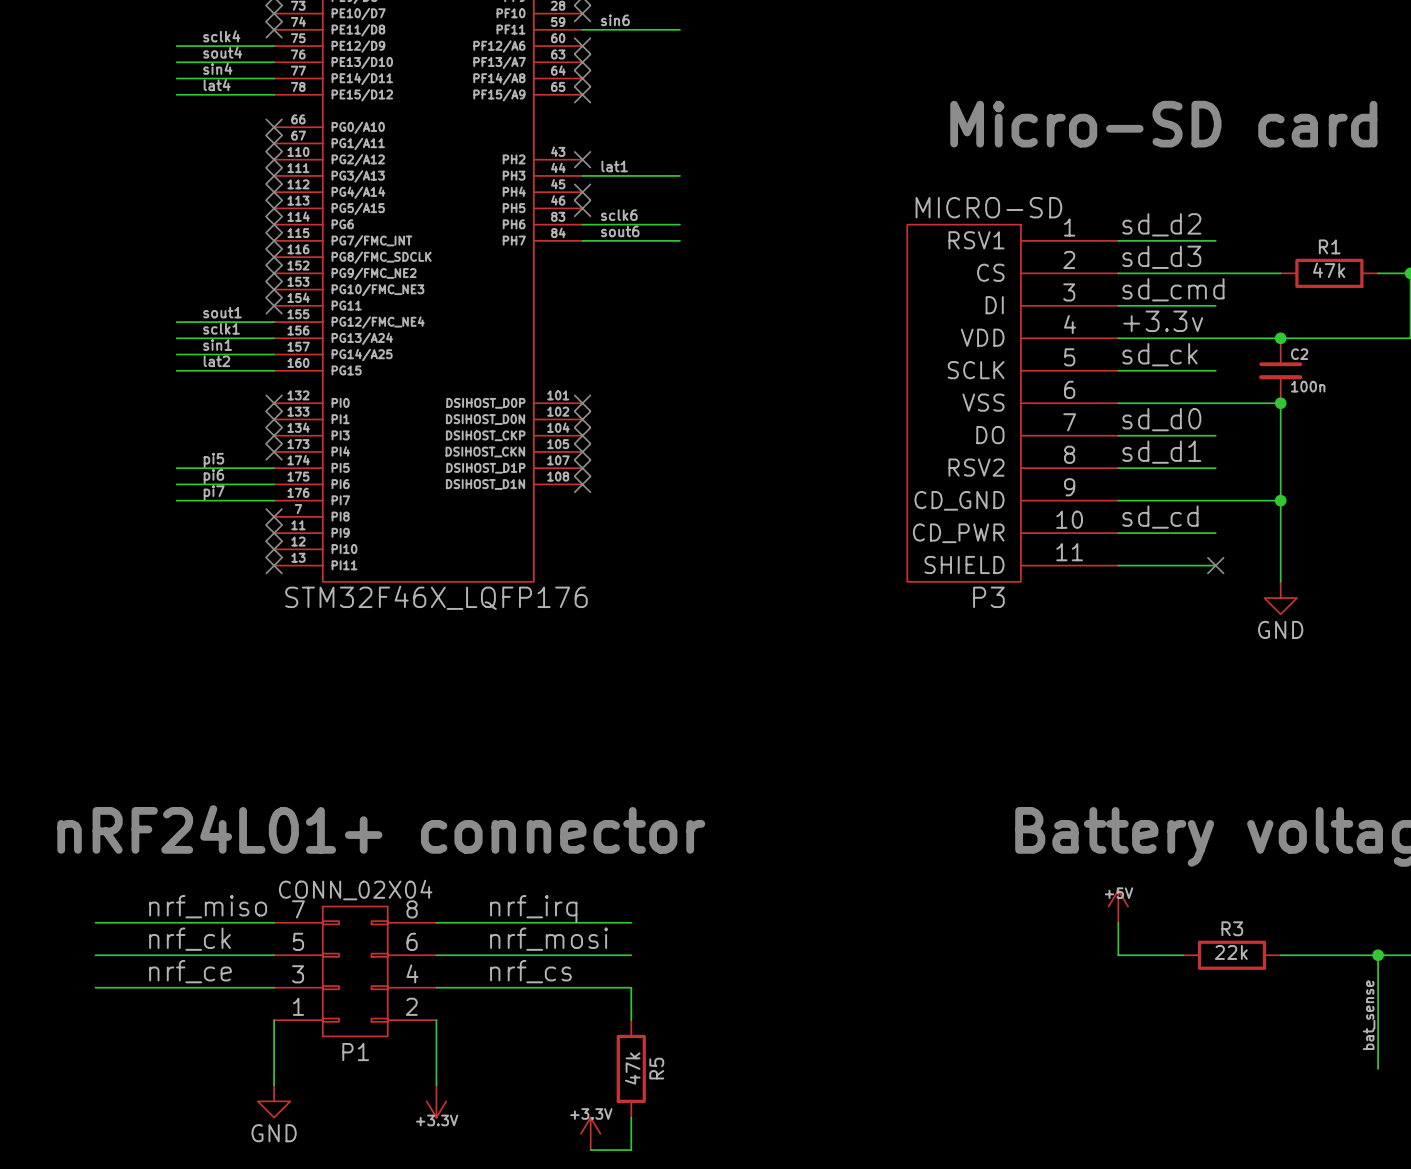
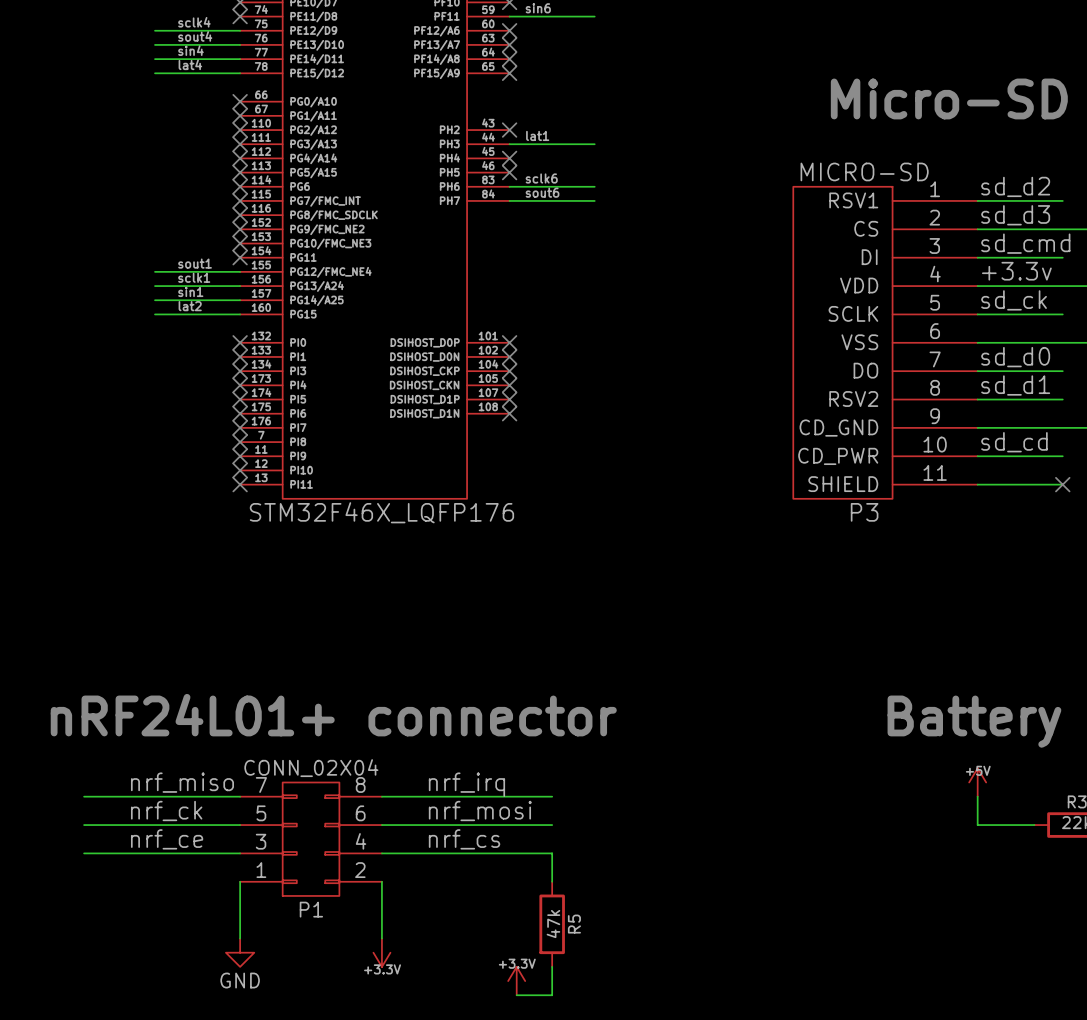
label: pi5 (213, 460) -> none
wire: (176, 468) (274, 468) -> none
no-connect mark: none -> (240, 399)
label: pi6 (213, 476) -> none
wire: (176, 484) (274, 484) -> none
no-connect mark: none -> (240, 413)
label: pi7 (214, 492) -> none
wire: (176, 500) (274, 500) -> none
no-connect mark: none -> (240, 427)

